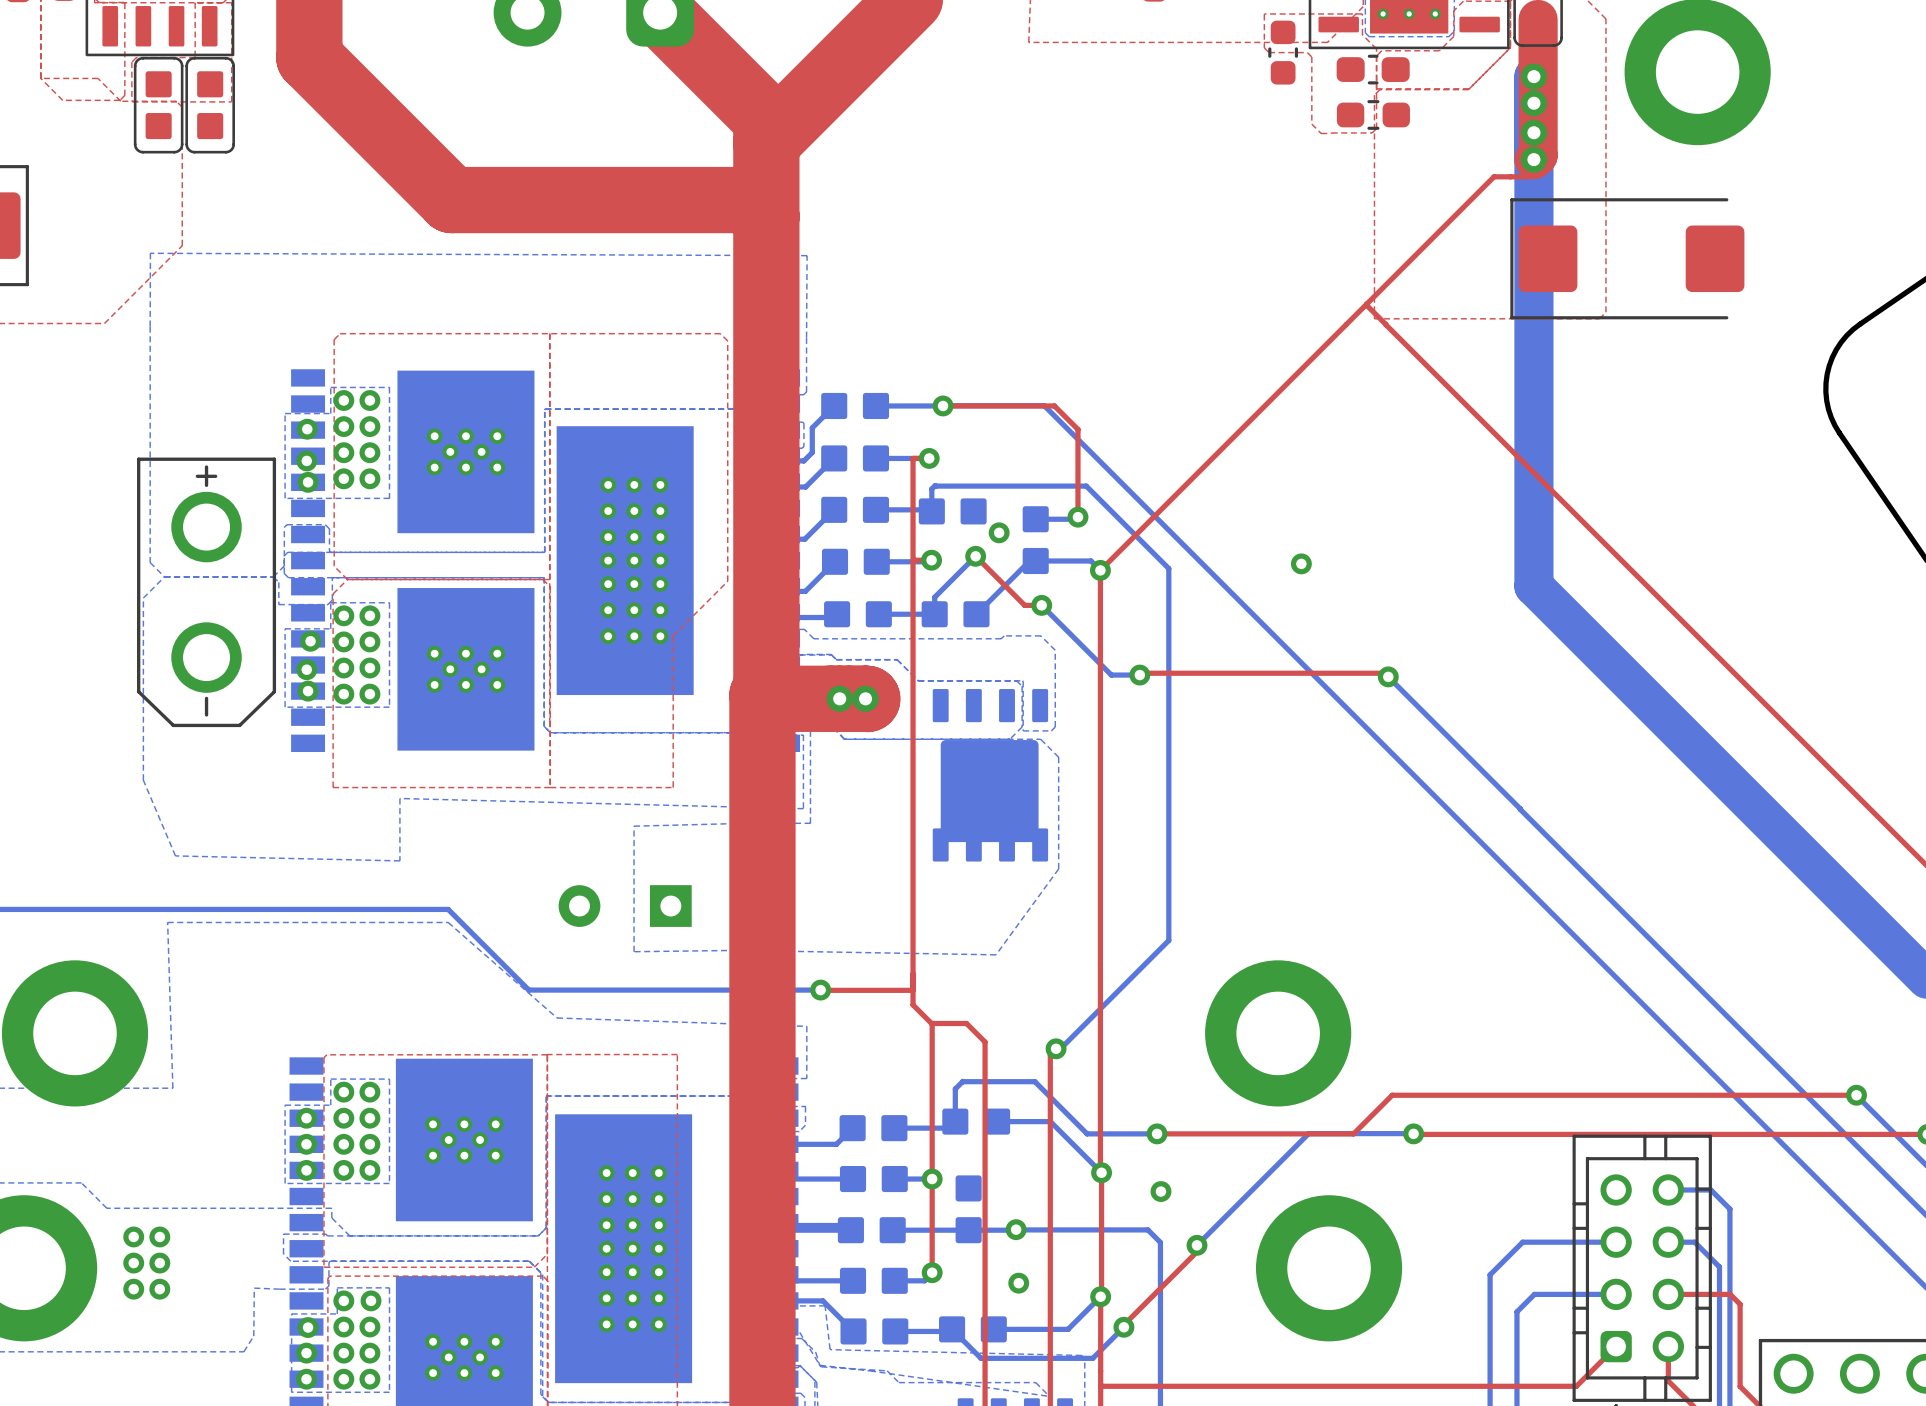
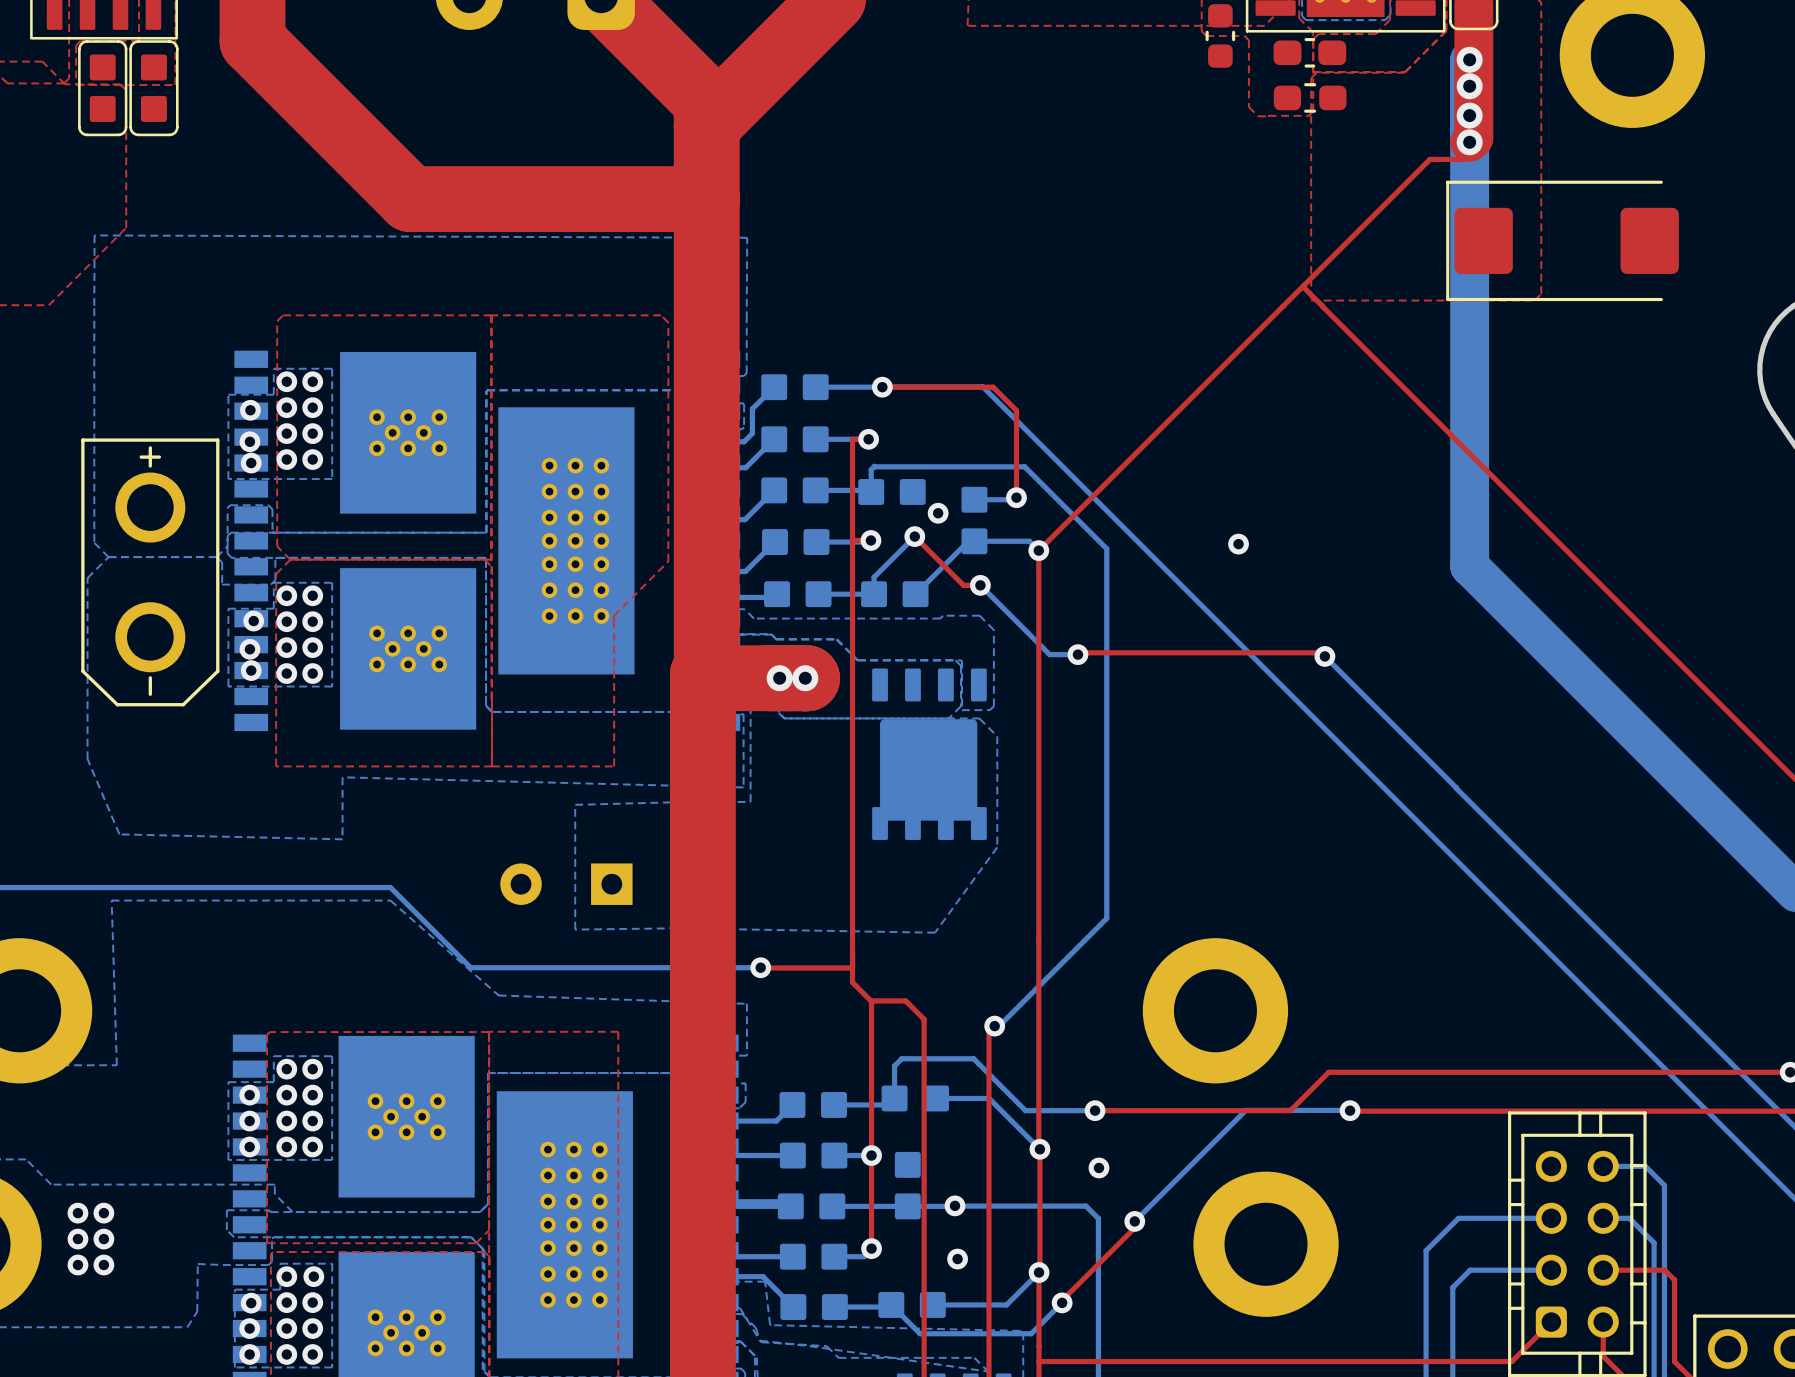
top track: (451, 200) (749, 200) (766, 216) -> (393, 182) (410, 199) (706, 199)

